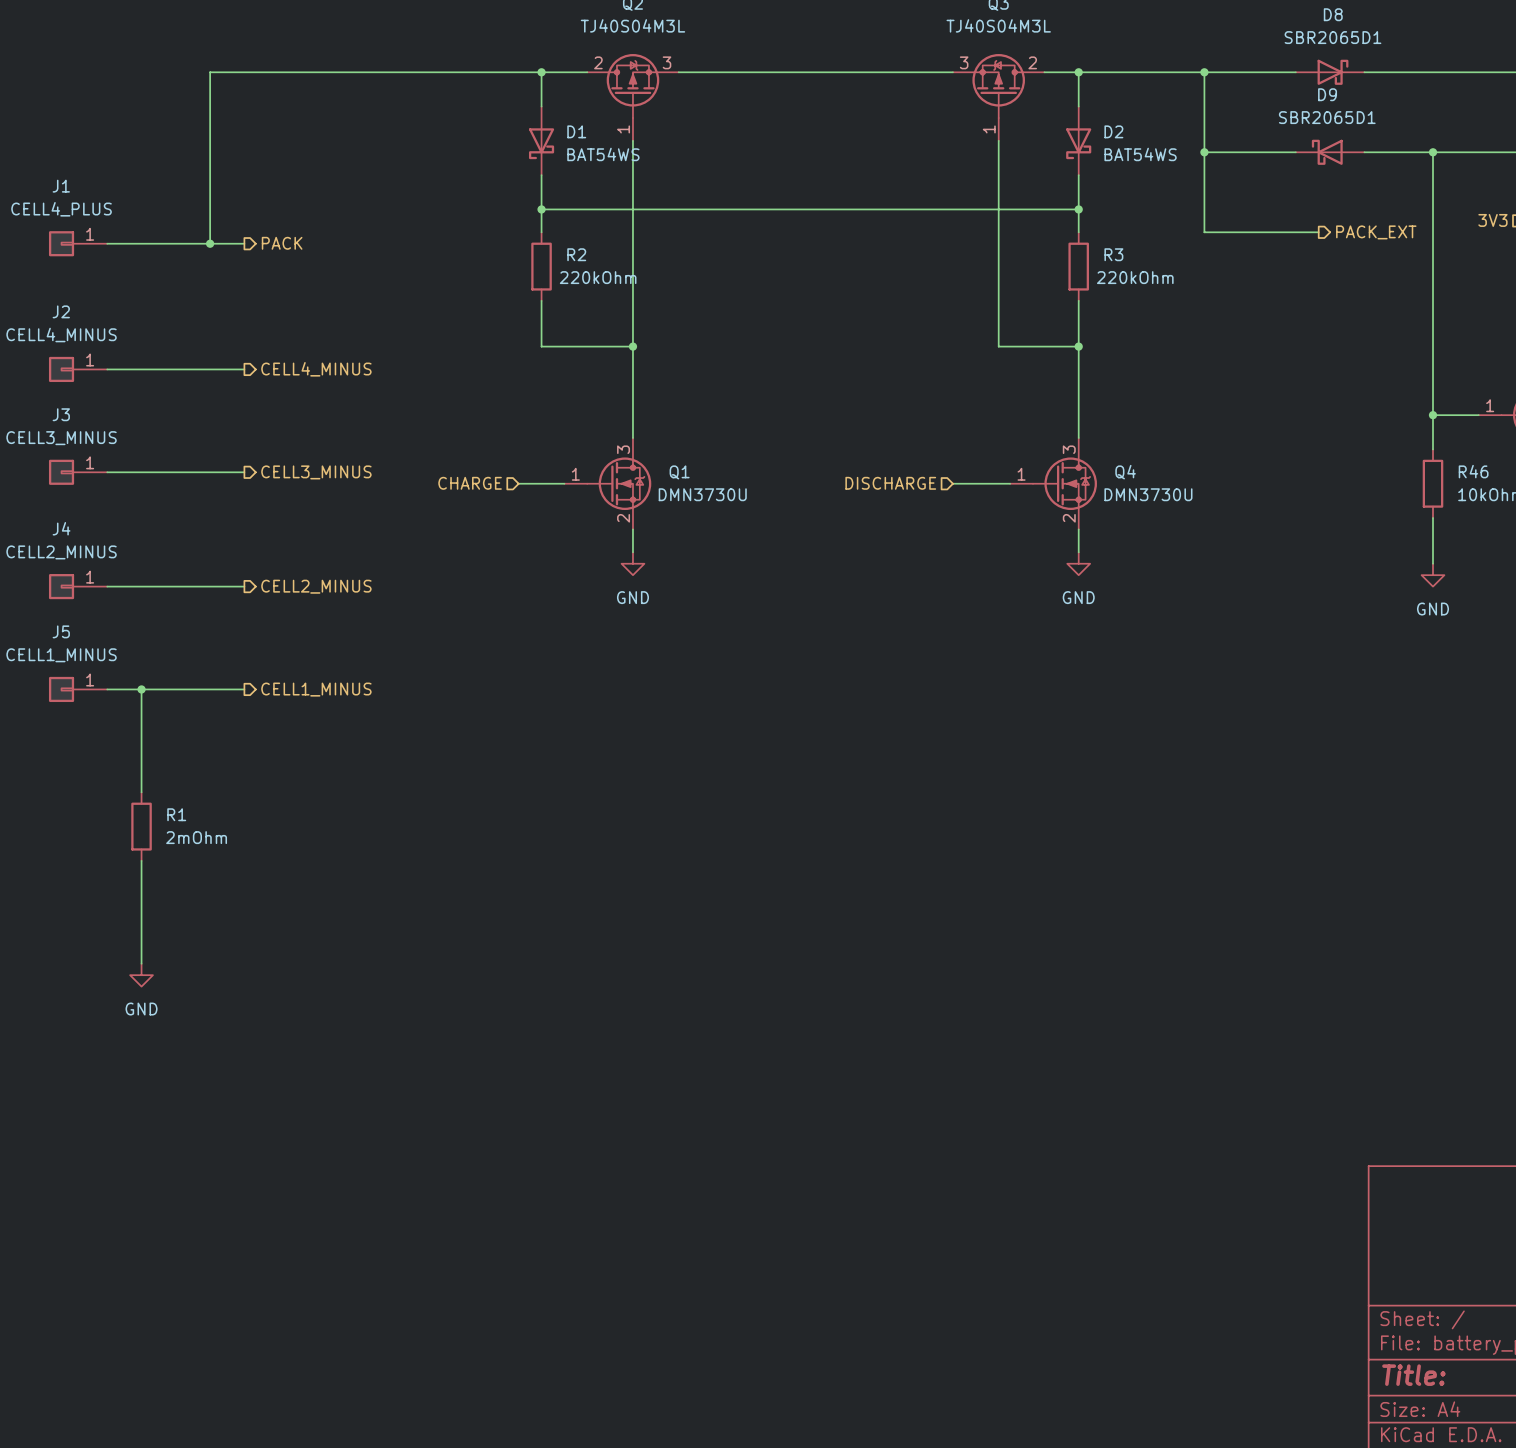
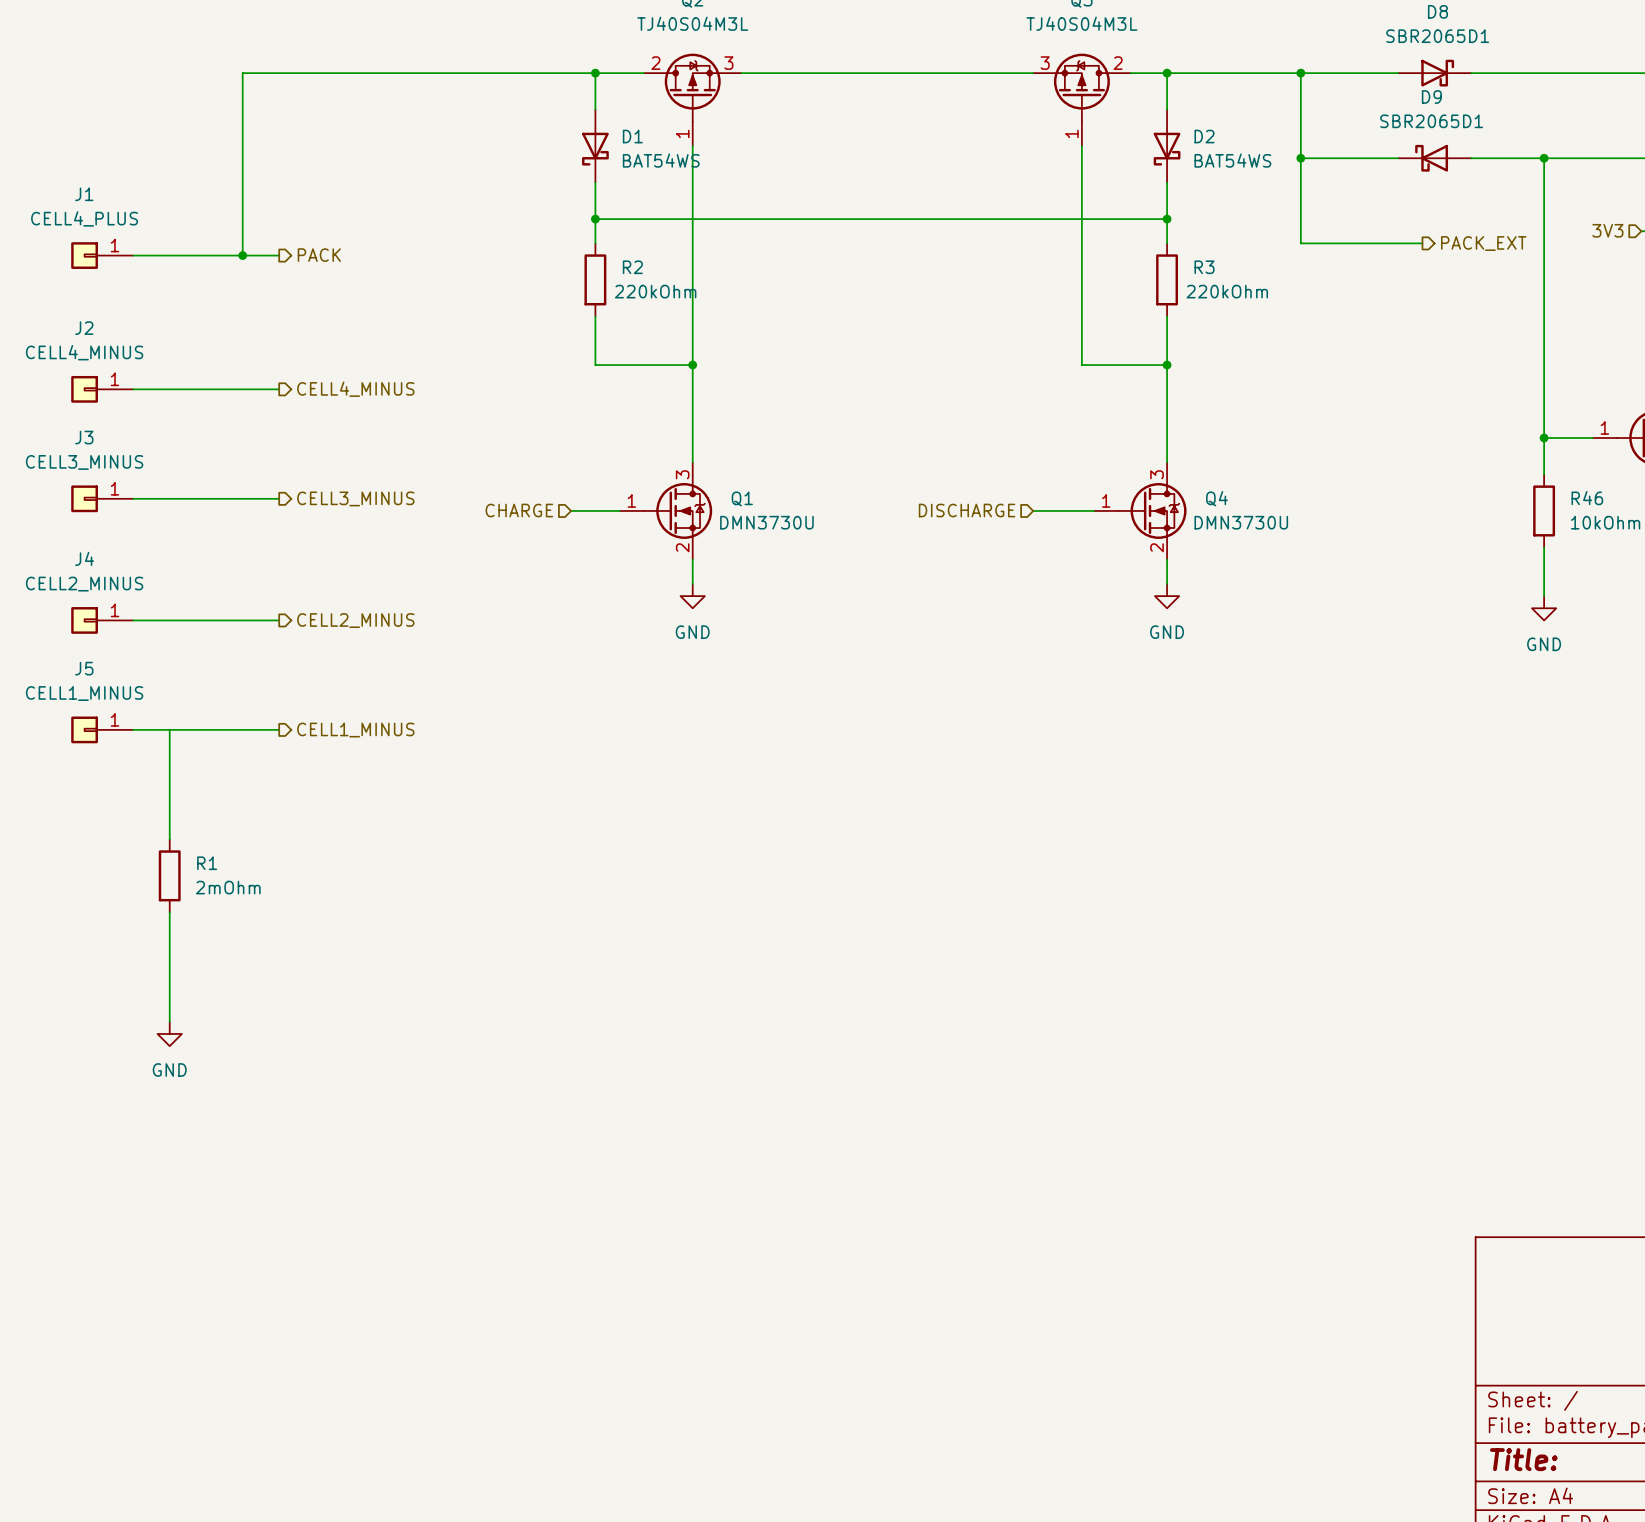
junction: (141, 689) -> none

